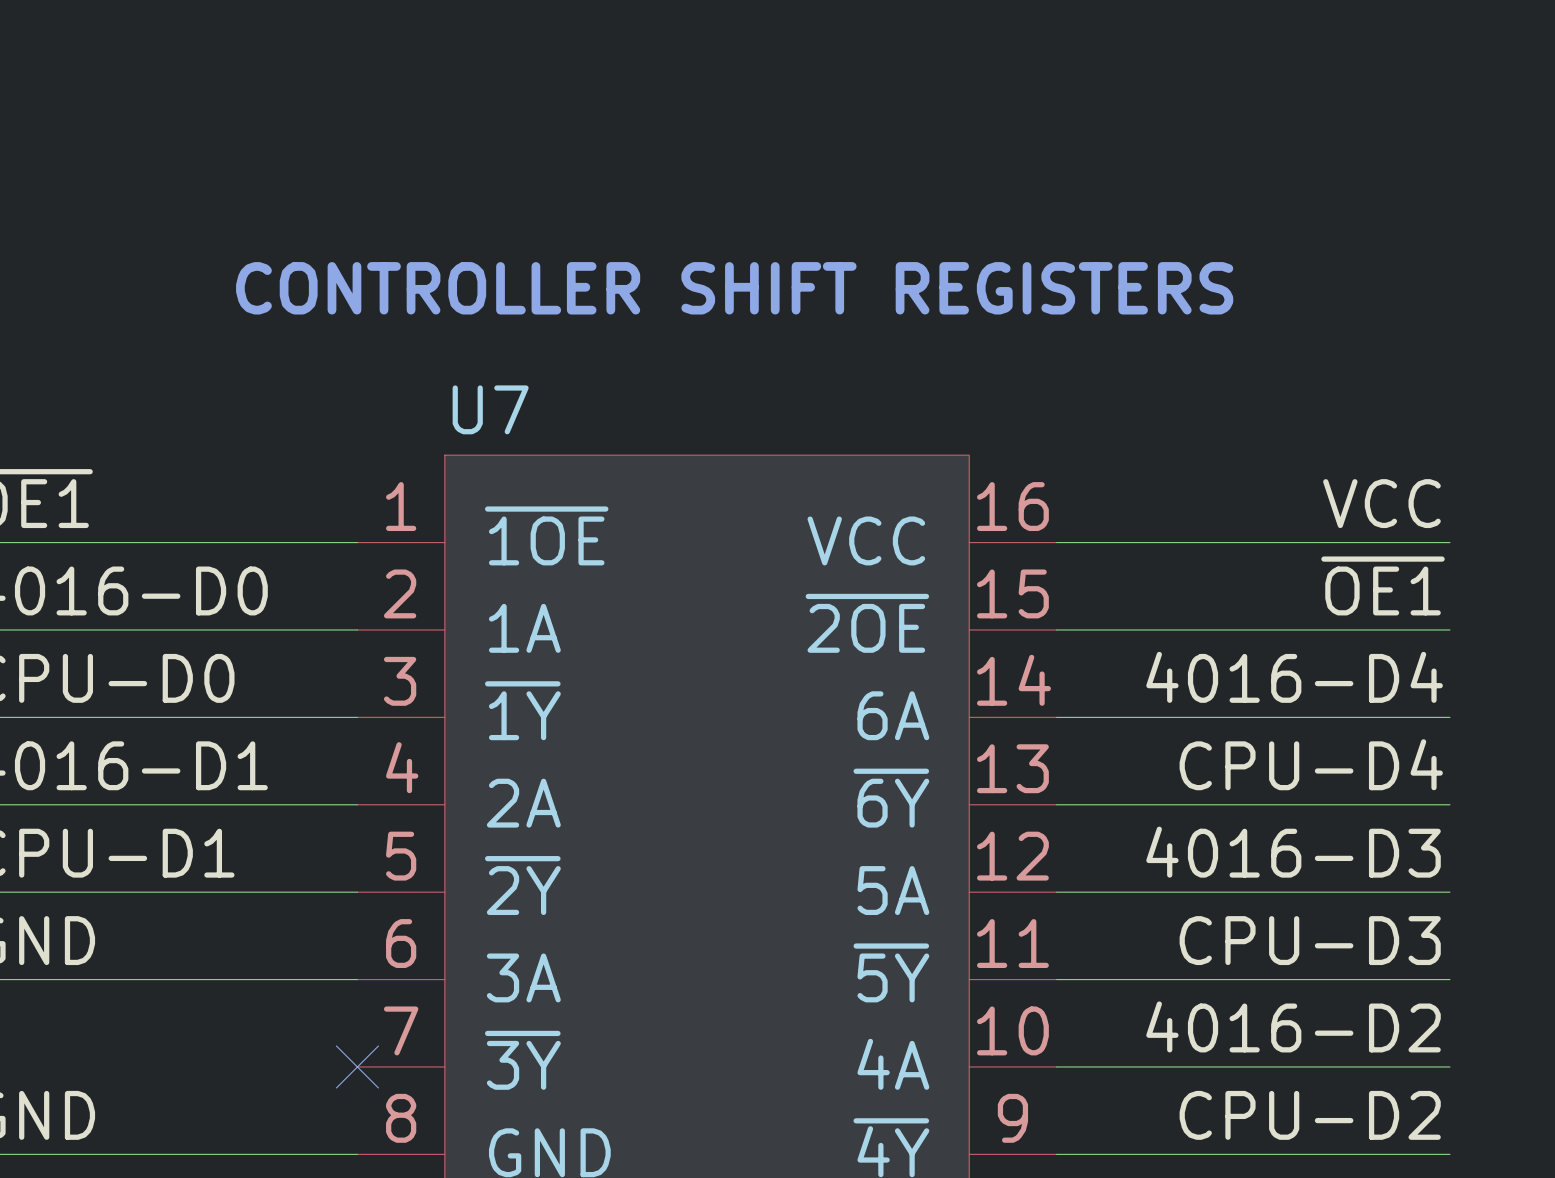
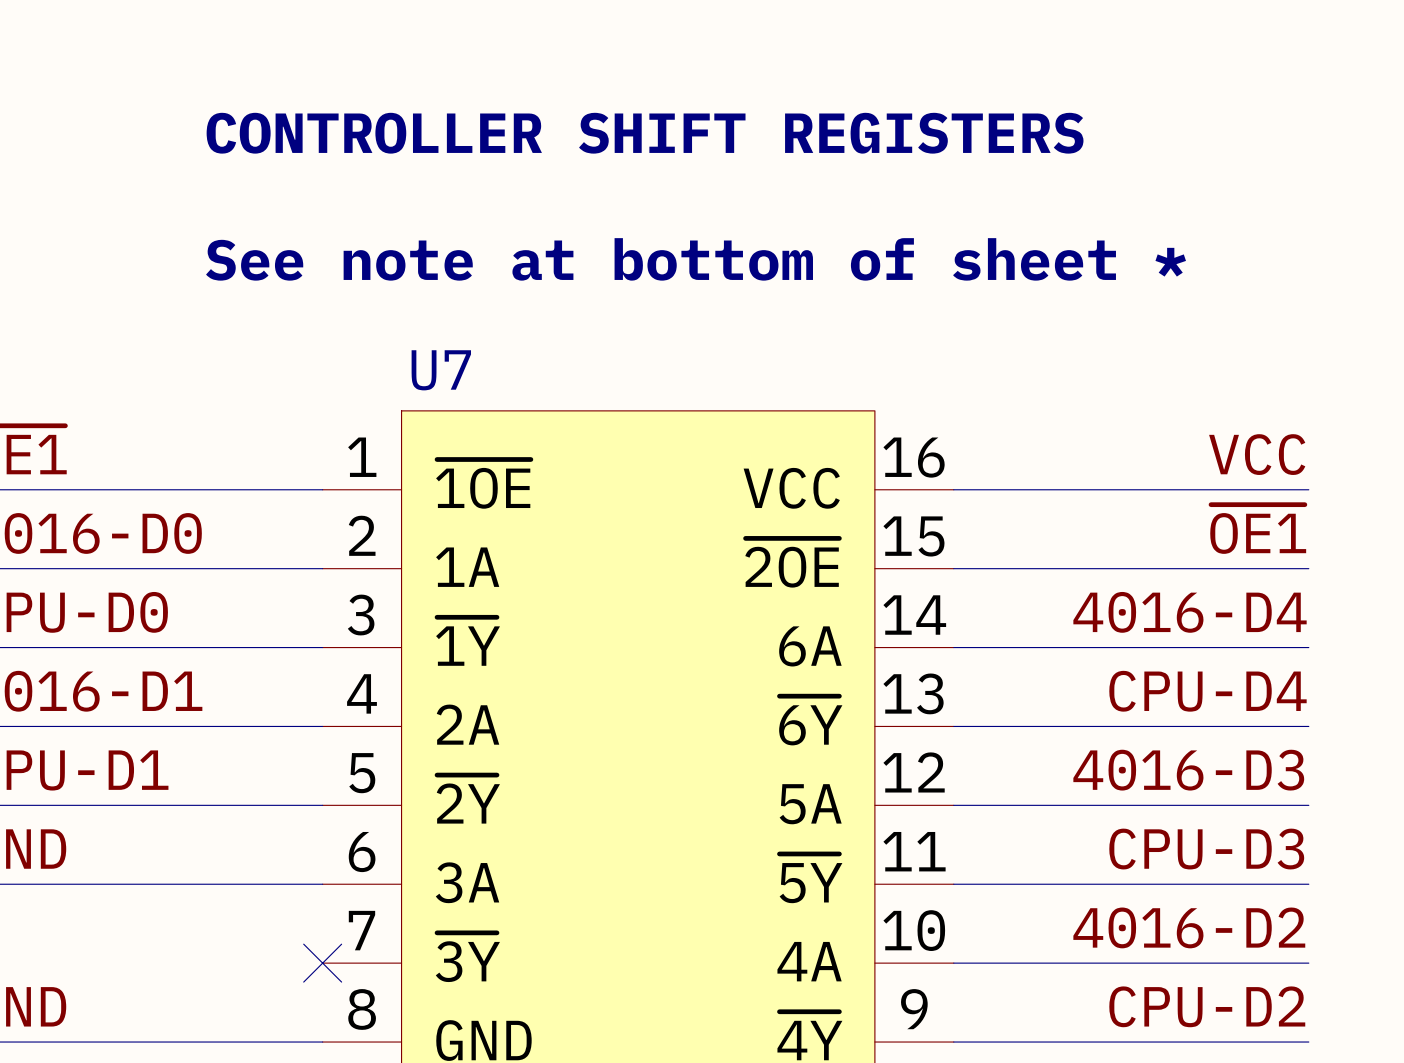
text: none -> CONTROLLER SHIFT REGISTERS (645, 133)
text: CONTROLLER SHIFT REGISTERS (734, 288) -> See note at bottom of sheet * (696, 259)

